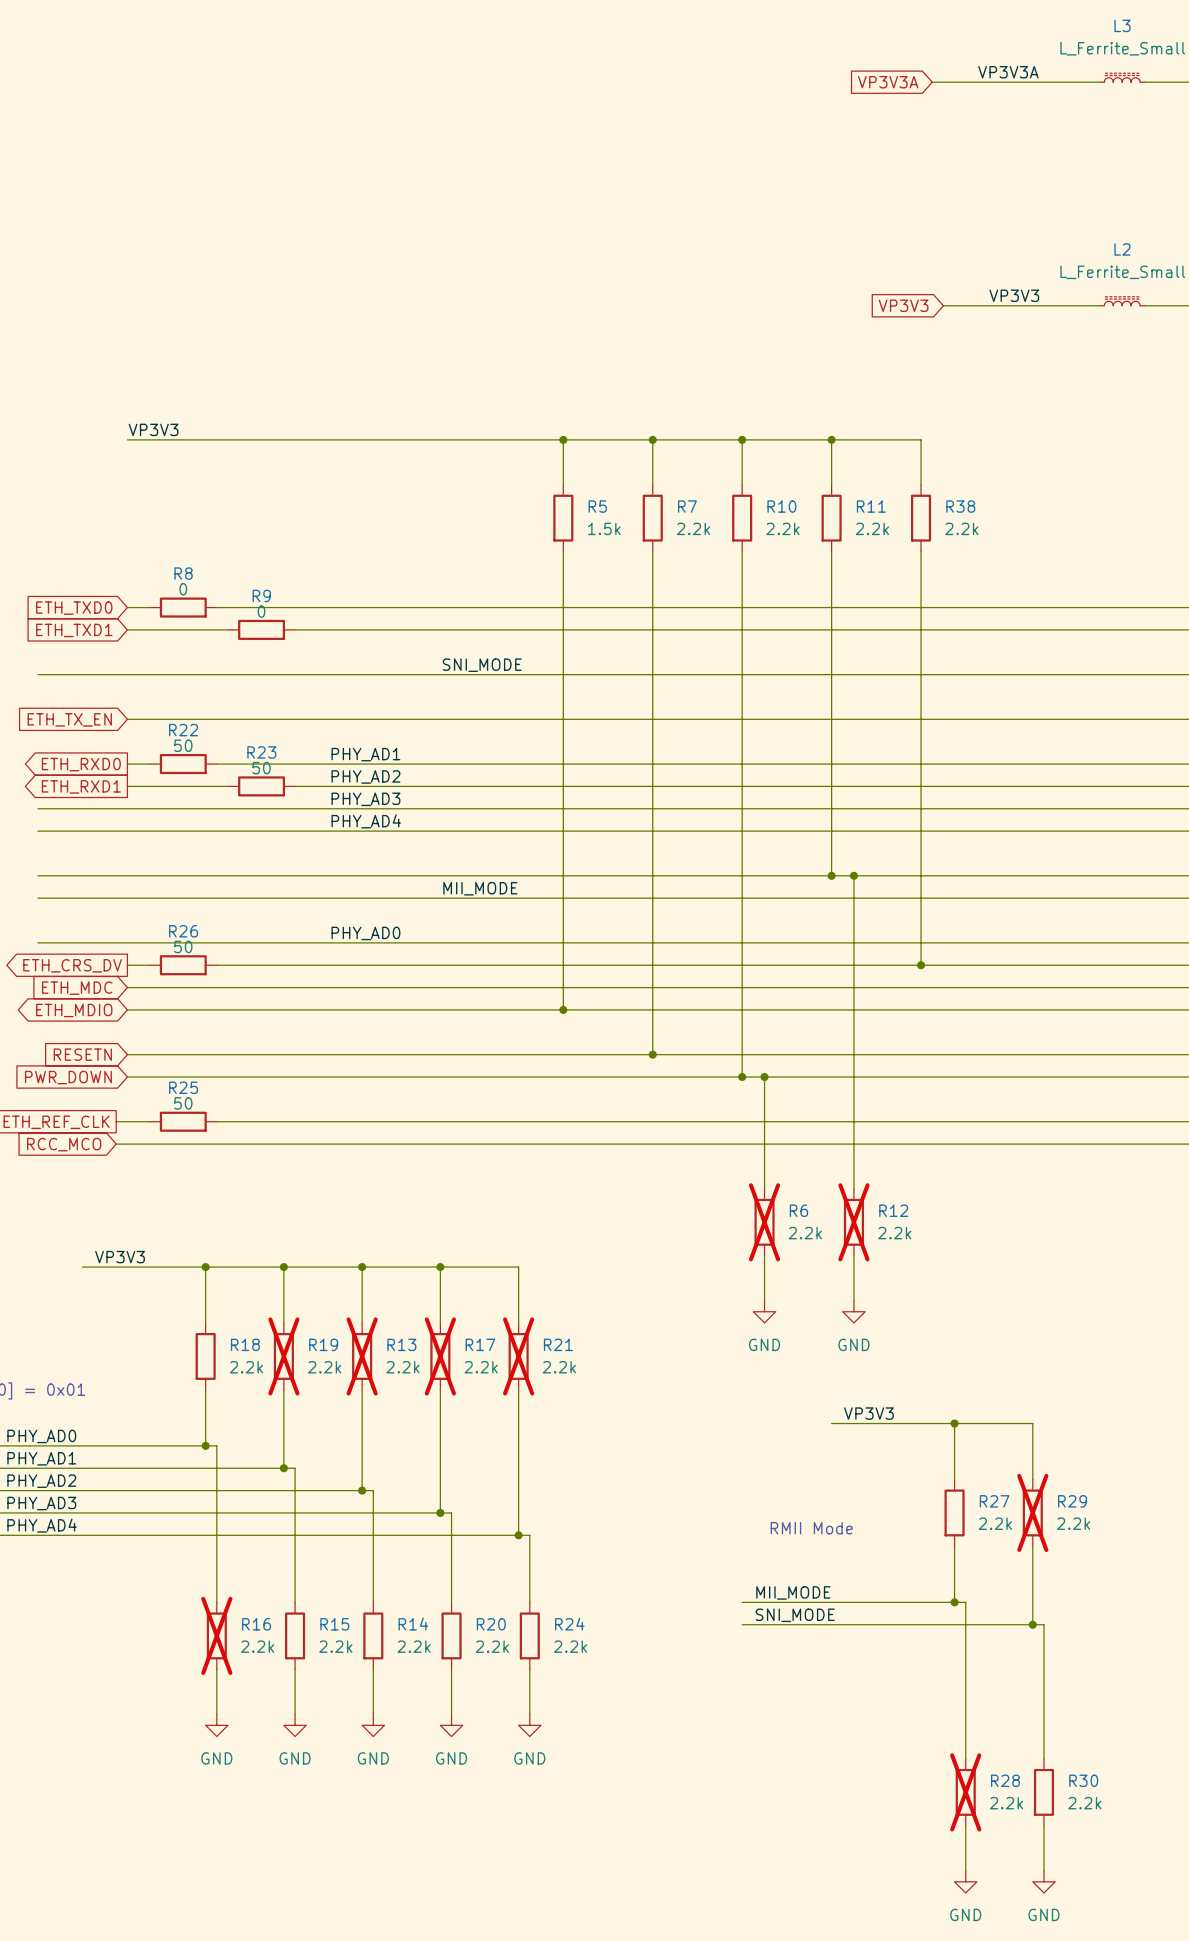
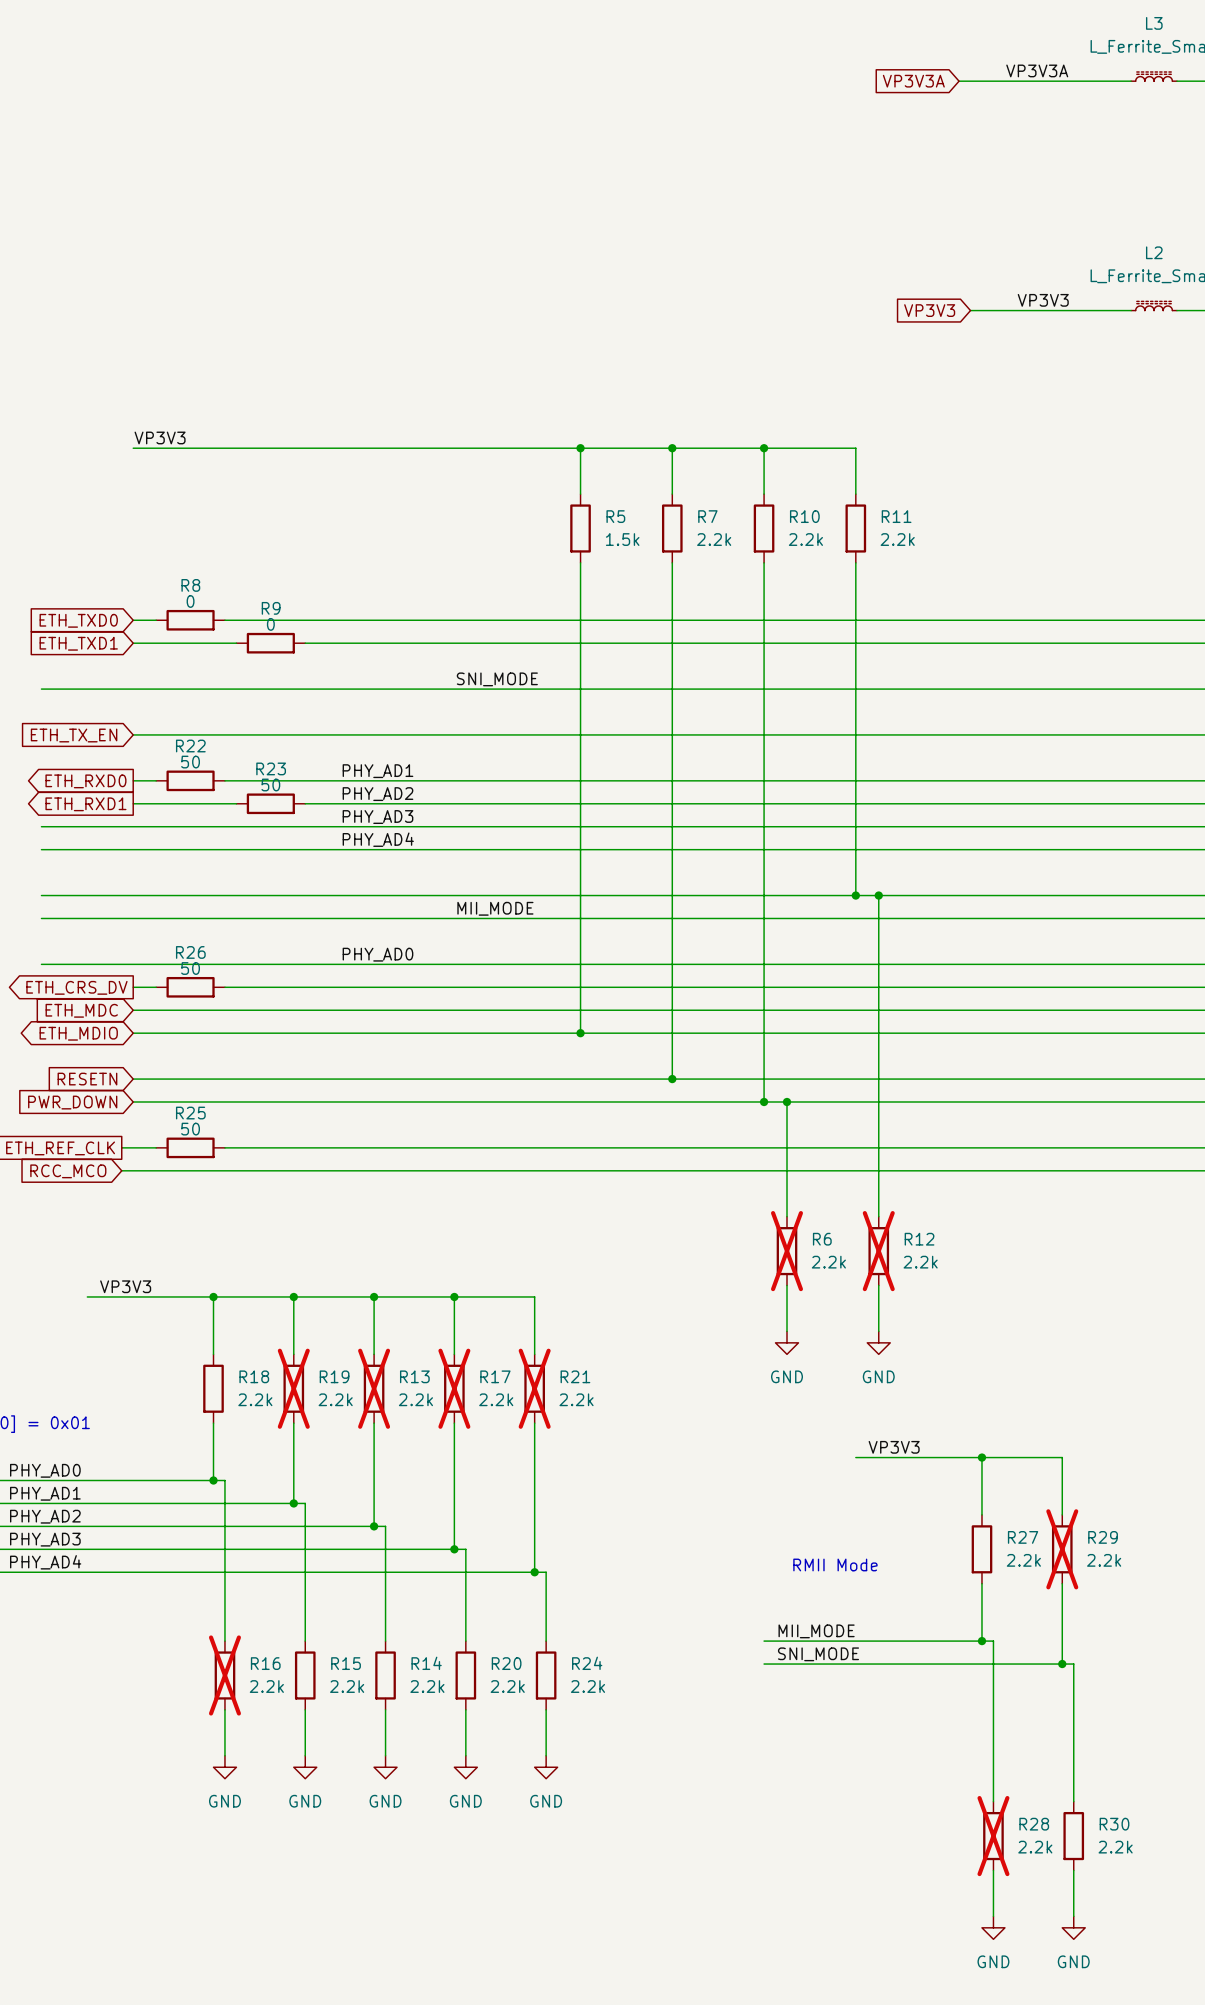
wire: (831, 439) (921, 439) (921, 484) -> none
junction: (831, 439) -> none
R38: 2.2k (921, 518) -> none
wire: (921, 551) (921, 965) -> none
junction: (921, 965) -> none

